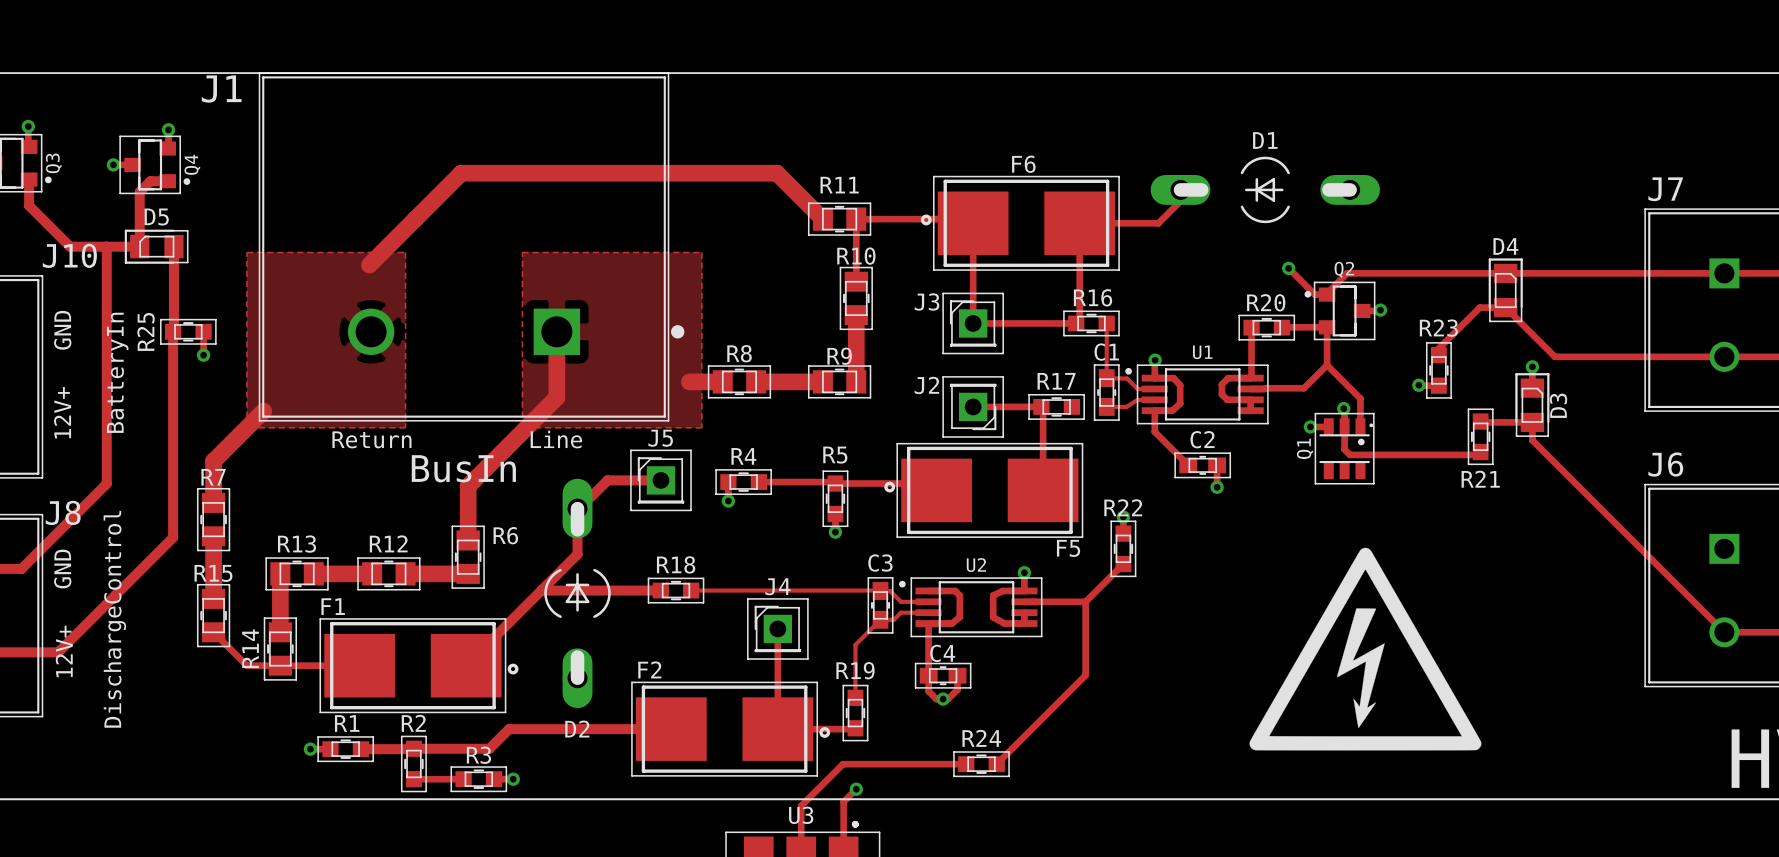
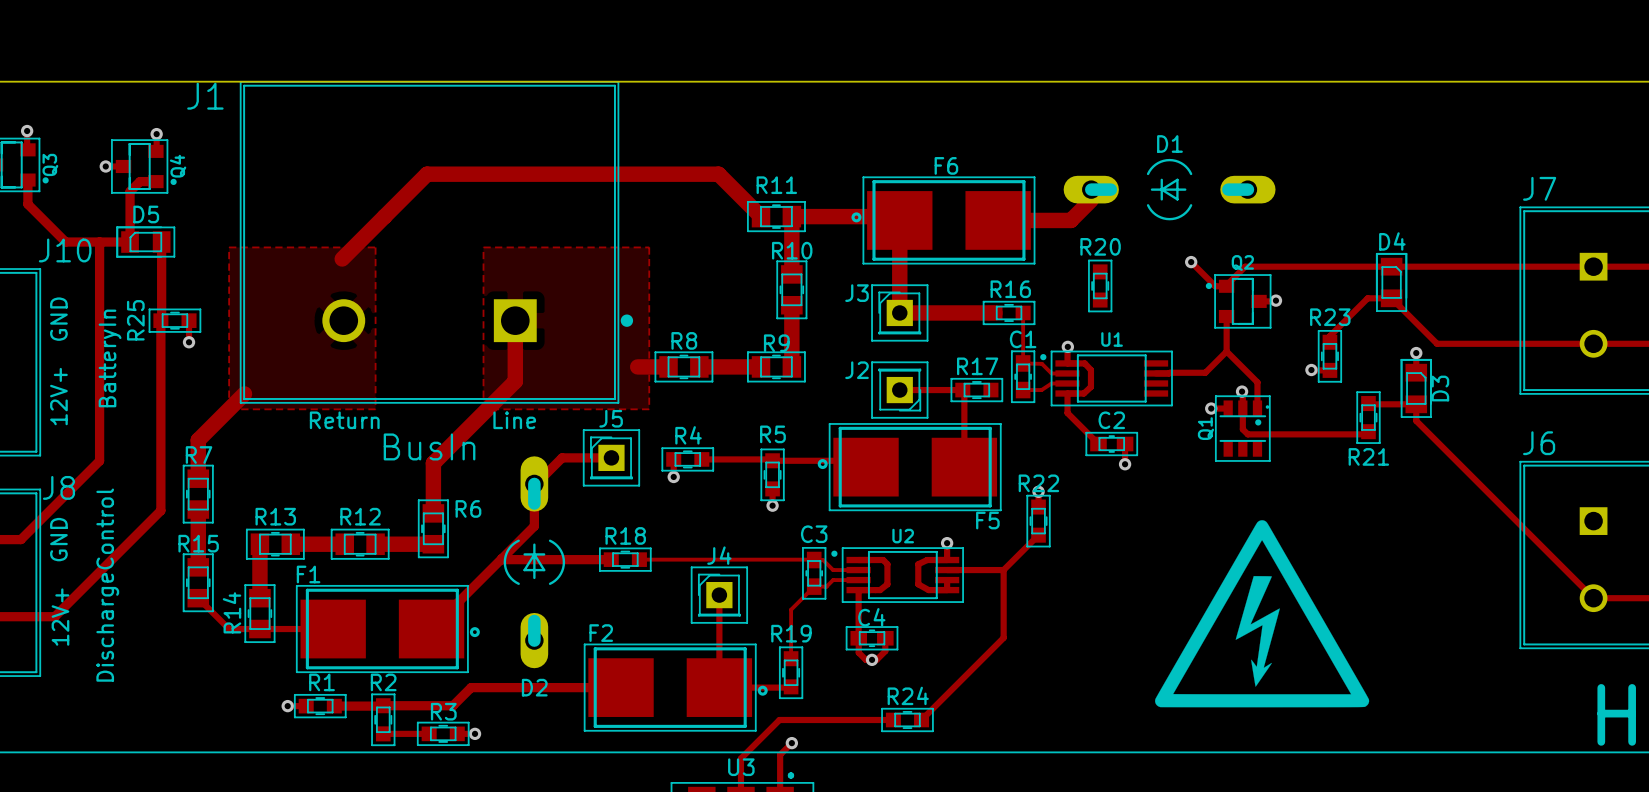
track width: thin (1180, 201) (1158, 223) (1079, 223) -> thick (1091, 200) (1070, 220) (998, 220)
track width: thin (856, 219) (968, 219) (973, 223) (973, 323) (1076, 323) -> thick (791, 216) (895, 216) (899, 220) (899, 312) (994, 312)
track width: thin (856, 223) (856, 281) -> thick (791, 220) (791, 274)
track: (1079, 223) (1079, 320) (1076, 323) -> none
track: (1251, 327) (1251, 377) (1228, 378) (1221, 384) (1221, 394) (1227, 399) (1250, 399) (1250, 410) -> none
R20 rotation: 0° (1266, 327) -> 90° clockwise (1100, 285)
R20 position: (1266, 327) -> (1100, 285)
track: (1327, 327) (1282, 327) -> none

